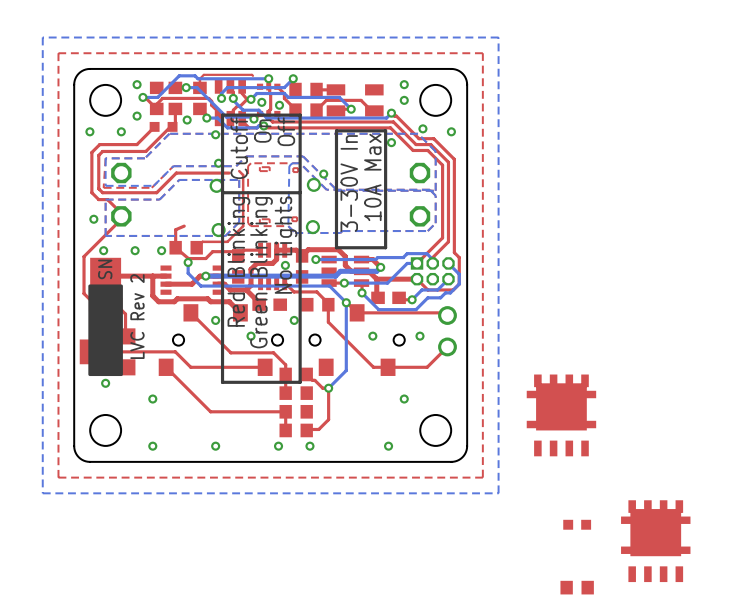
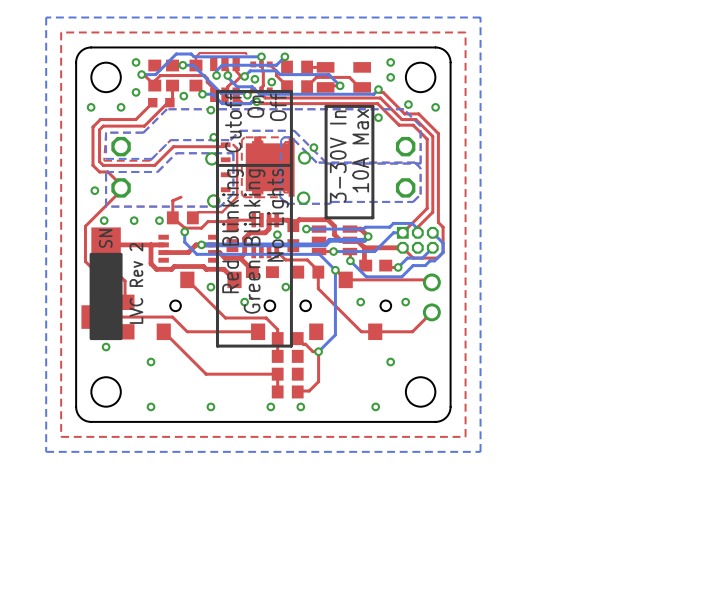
part: none -> (257, 167)
part: (561, 415) -> none
part: (577, 524) -> none
part: (655, 541) -> none
part: (577, 587) -> none

